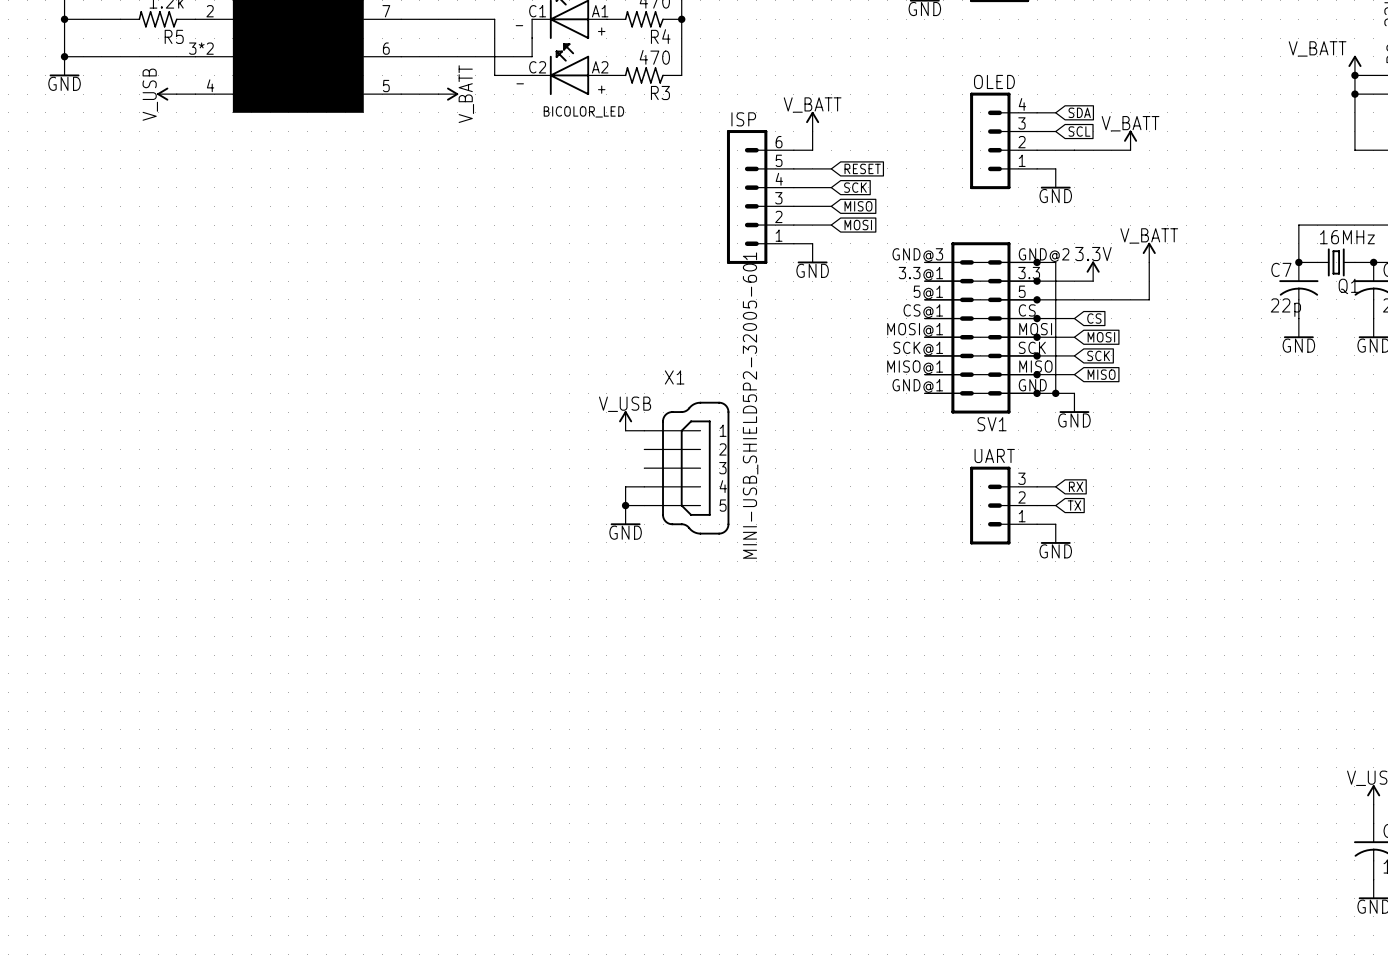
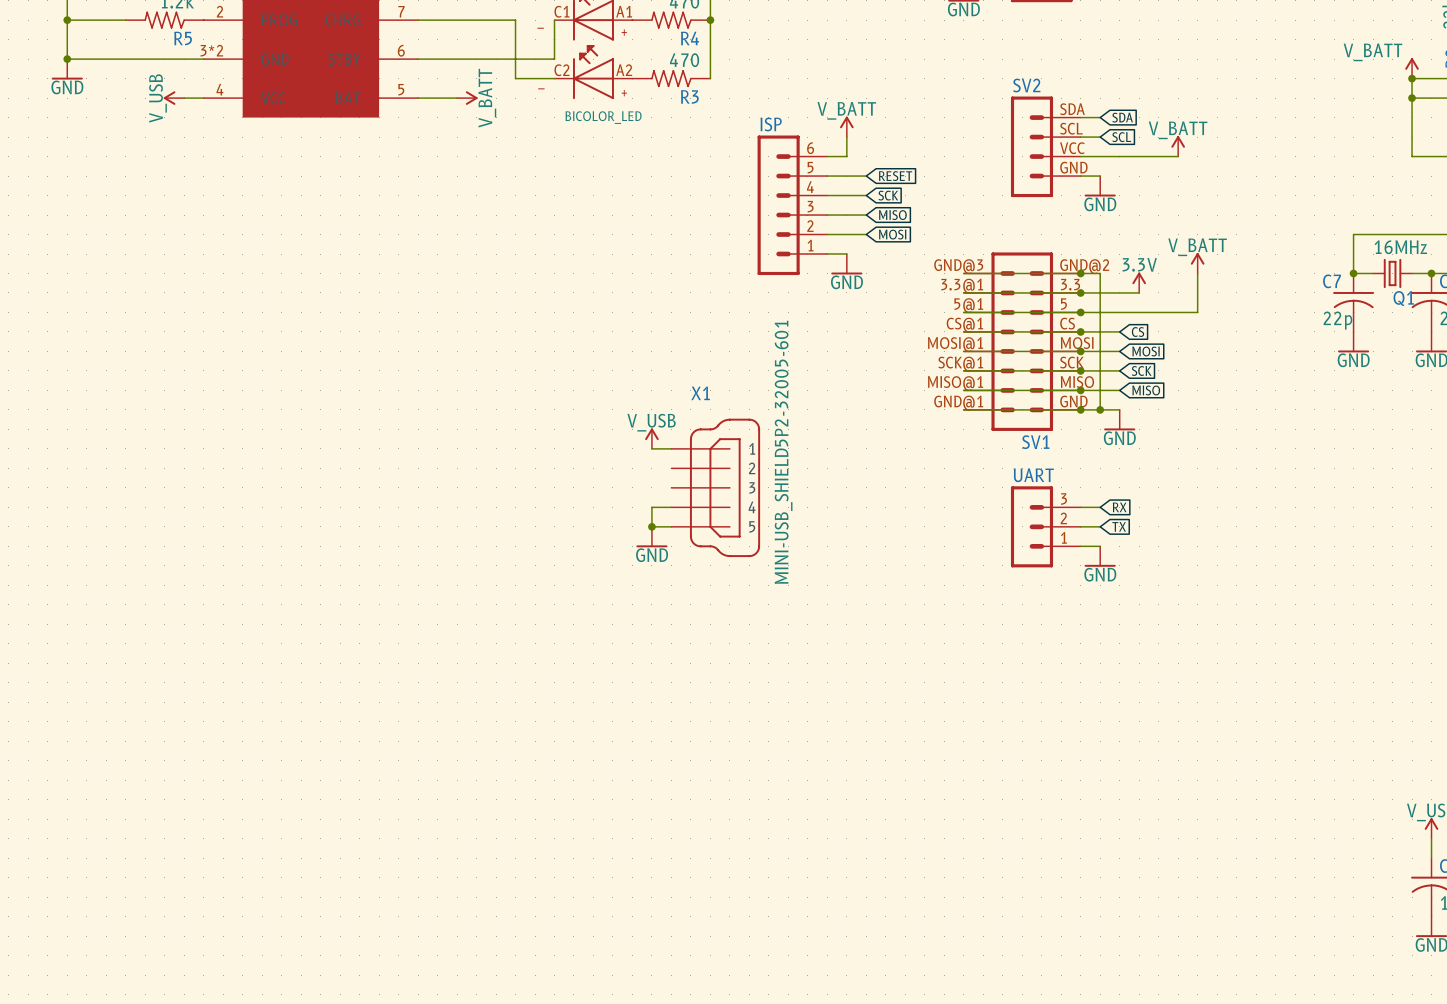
OLED name: OLED (994, 81) -> SV2 (1026, 85)
OLED pin number: 4 (1022, 104) -> SDA (1072, 109)
OLED pin number: 3 (1021, 123) -> SCL (1071, 128)
OLED pin number: 2 (1021, 142) -> VCC (1072, 148)
OLED pin number: 1 (1022, 160) -> GND (1073, 167)

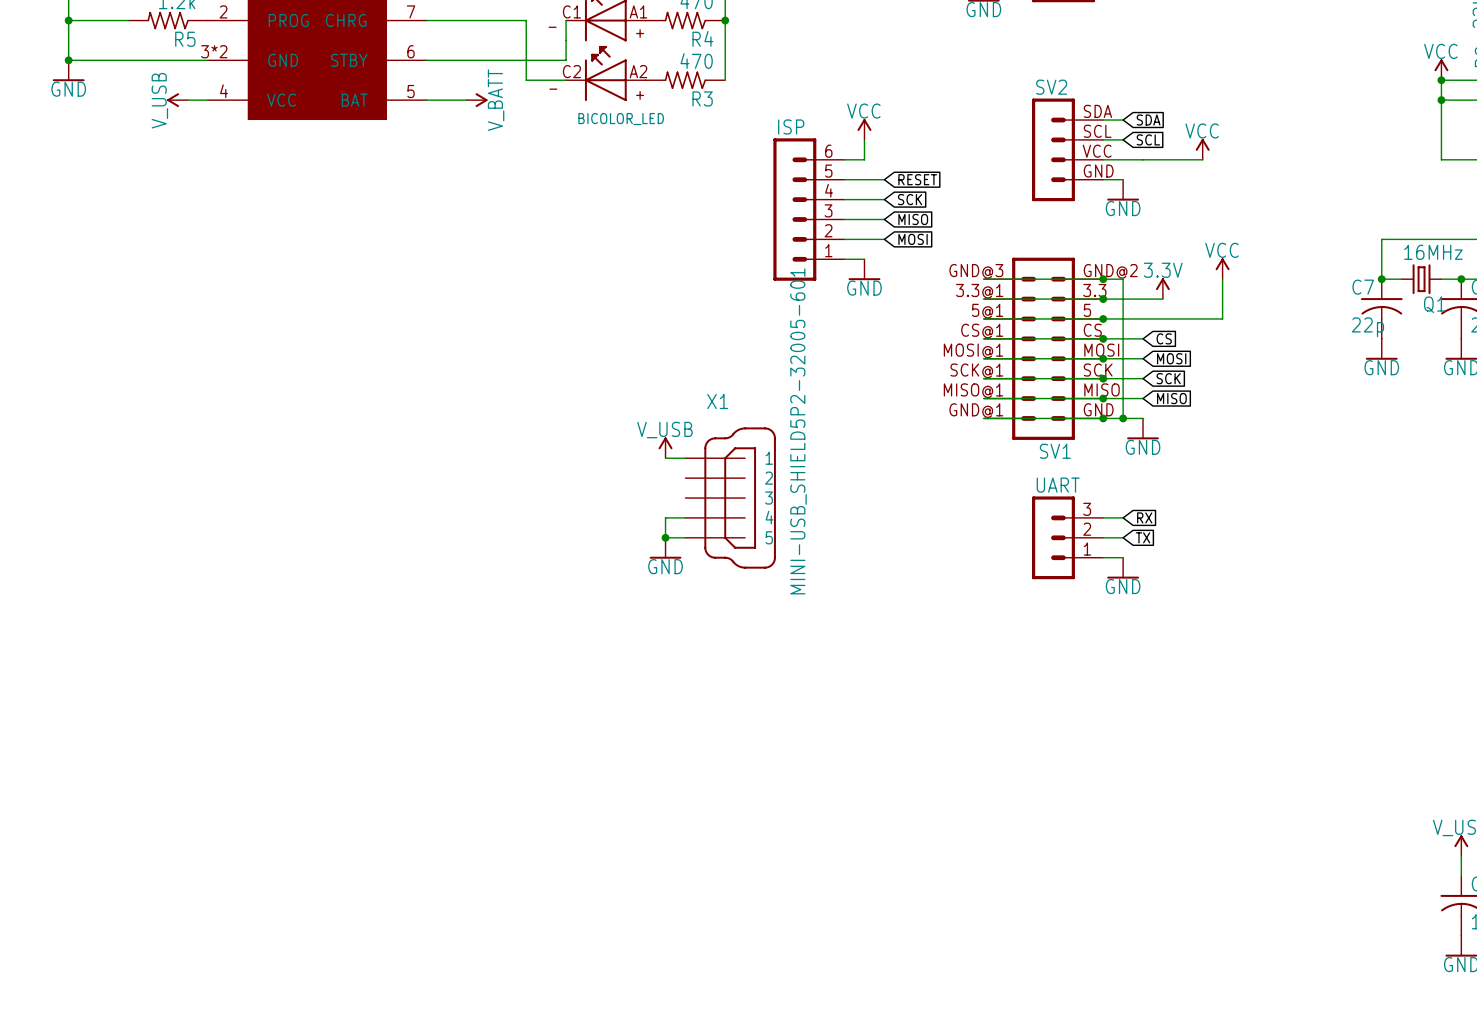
power symbol: V_BATT (1412, 68) -> VCC (1441, 69)
power symbol: V_BATT (846, 126) -> VCC (864, 129)
power symbol: V_BATT (1178, 146) -> VCC (1202, 149)
power symbol: V_BATT (1197, 263) -> VCC (1222, 268)

